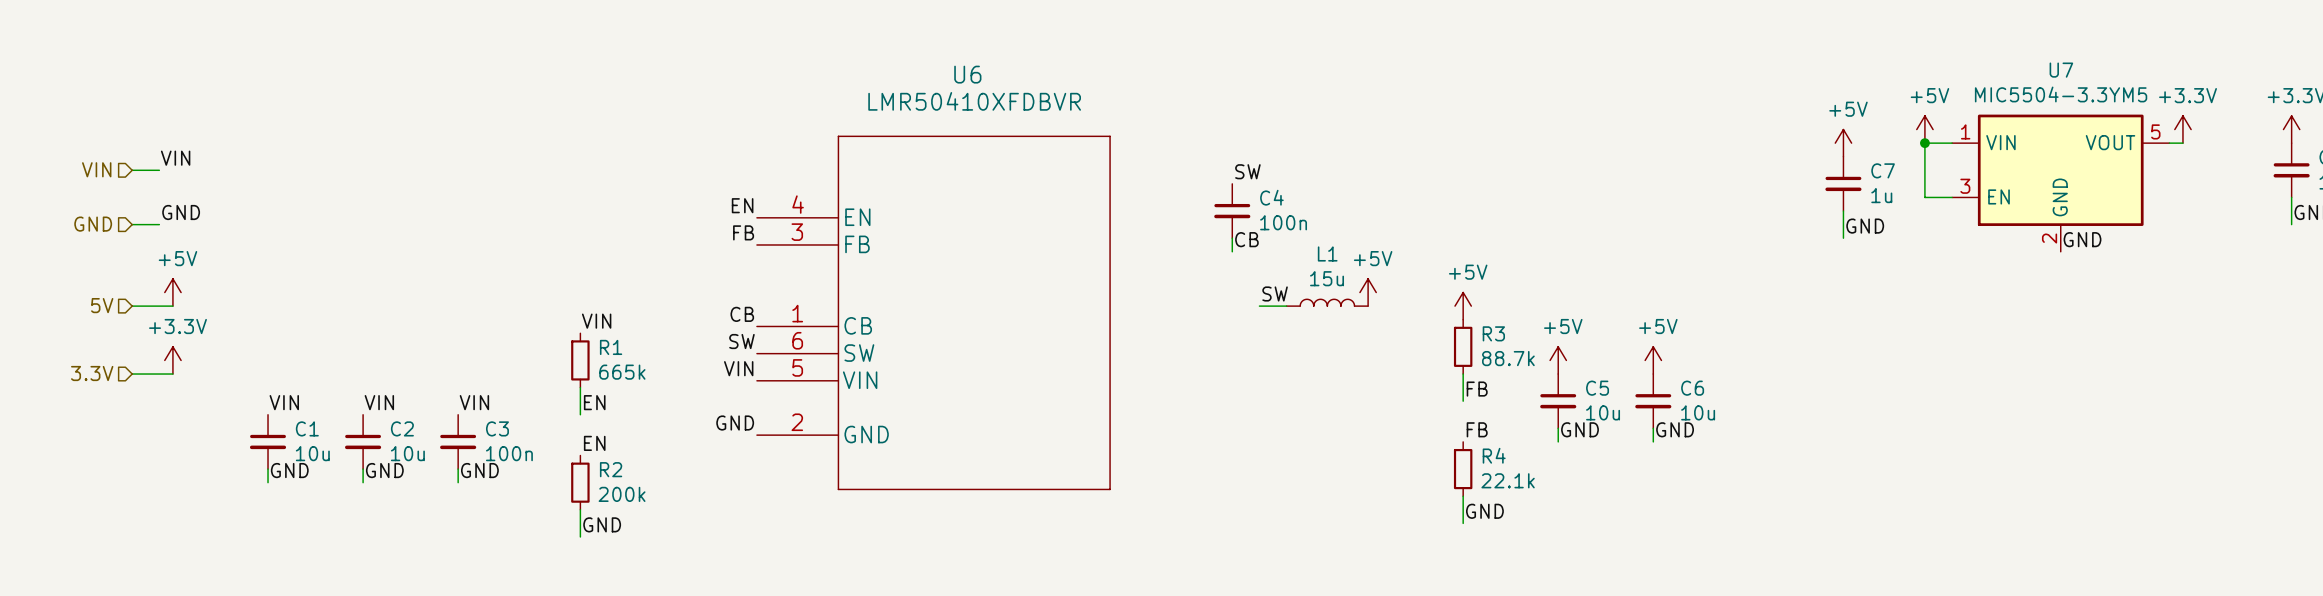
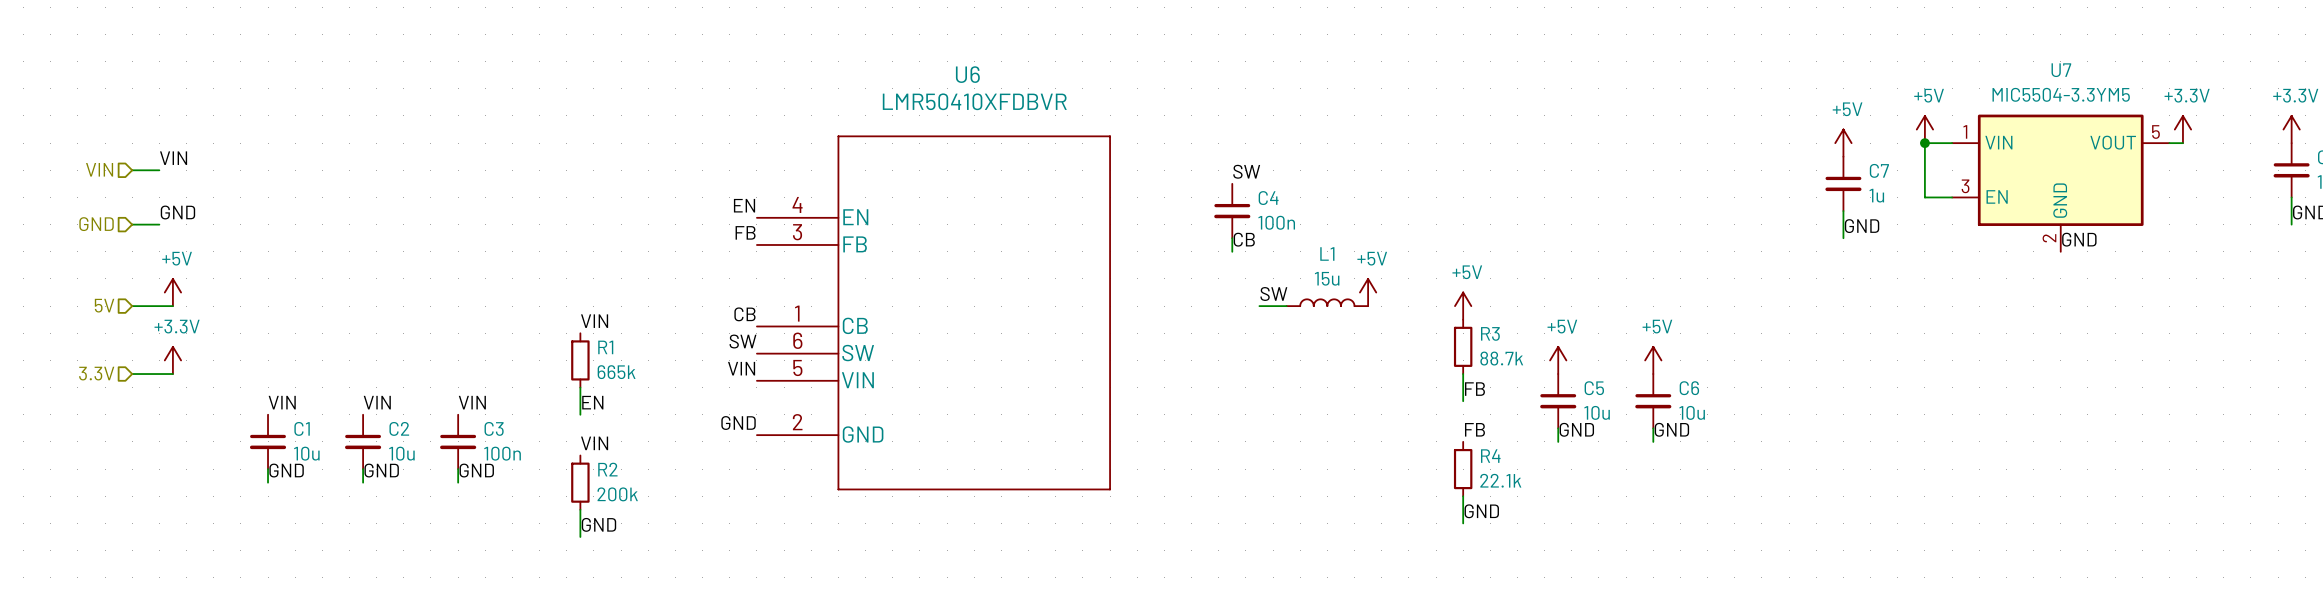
label: EN (594, 443) -> VIN (594, 443)

